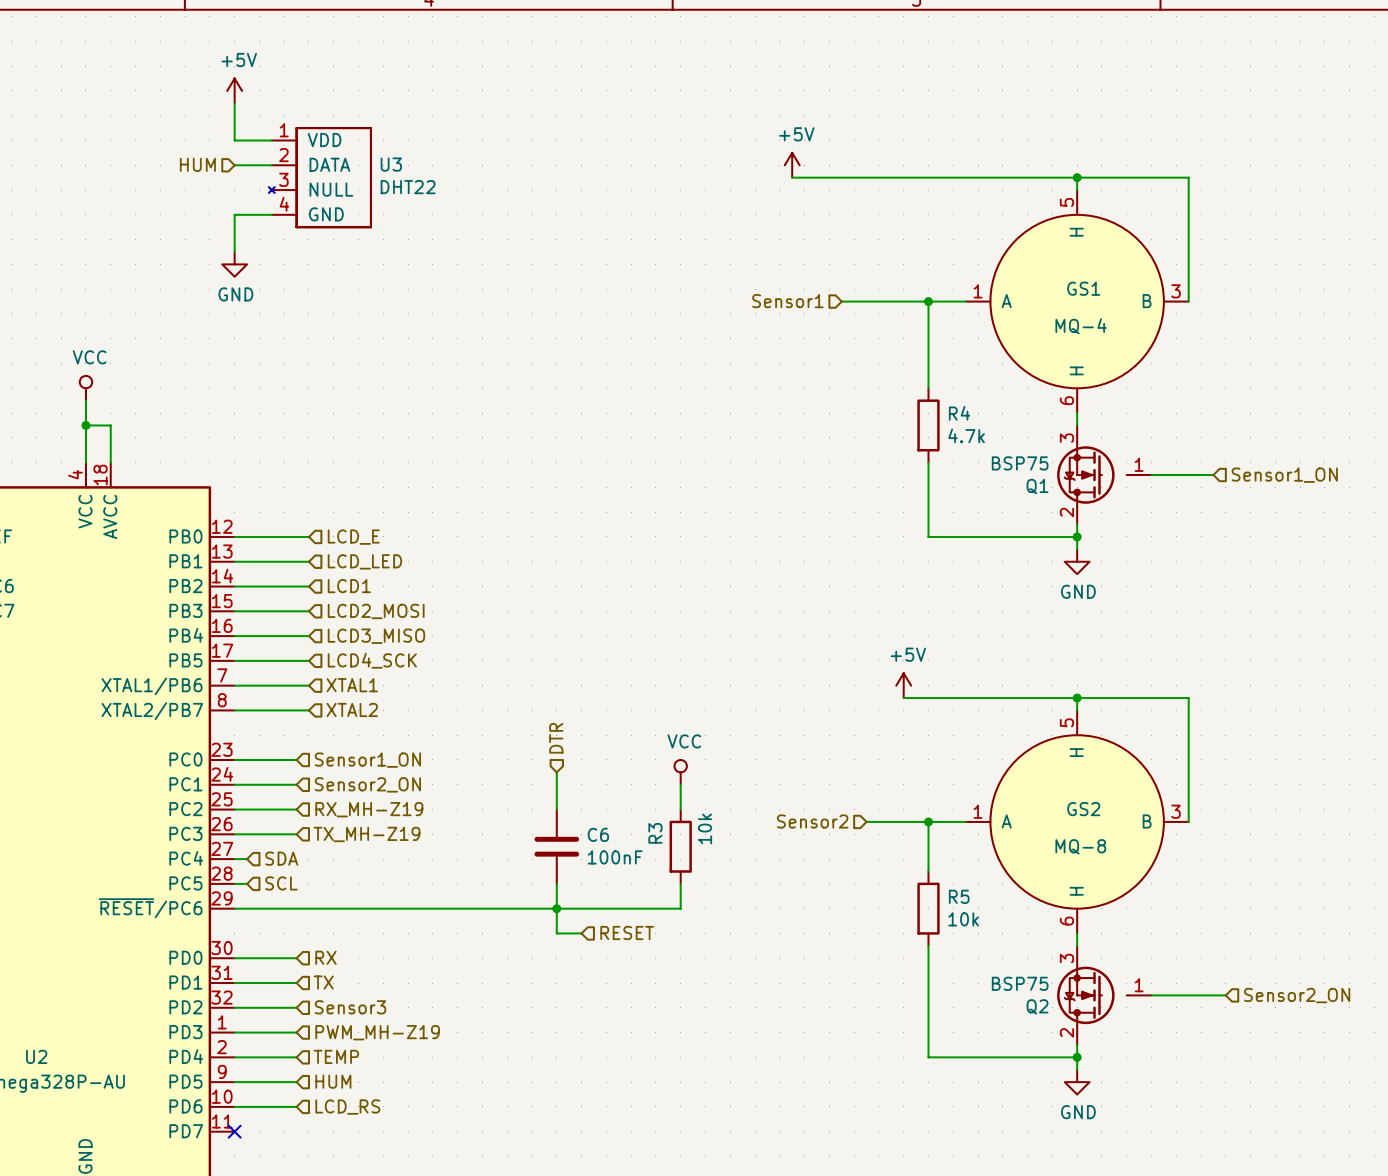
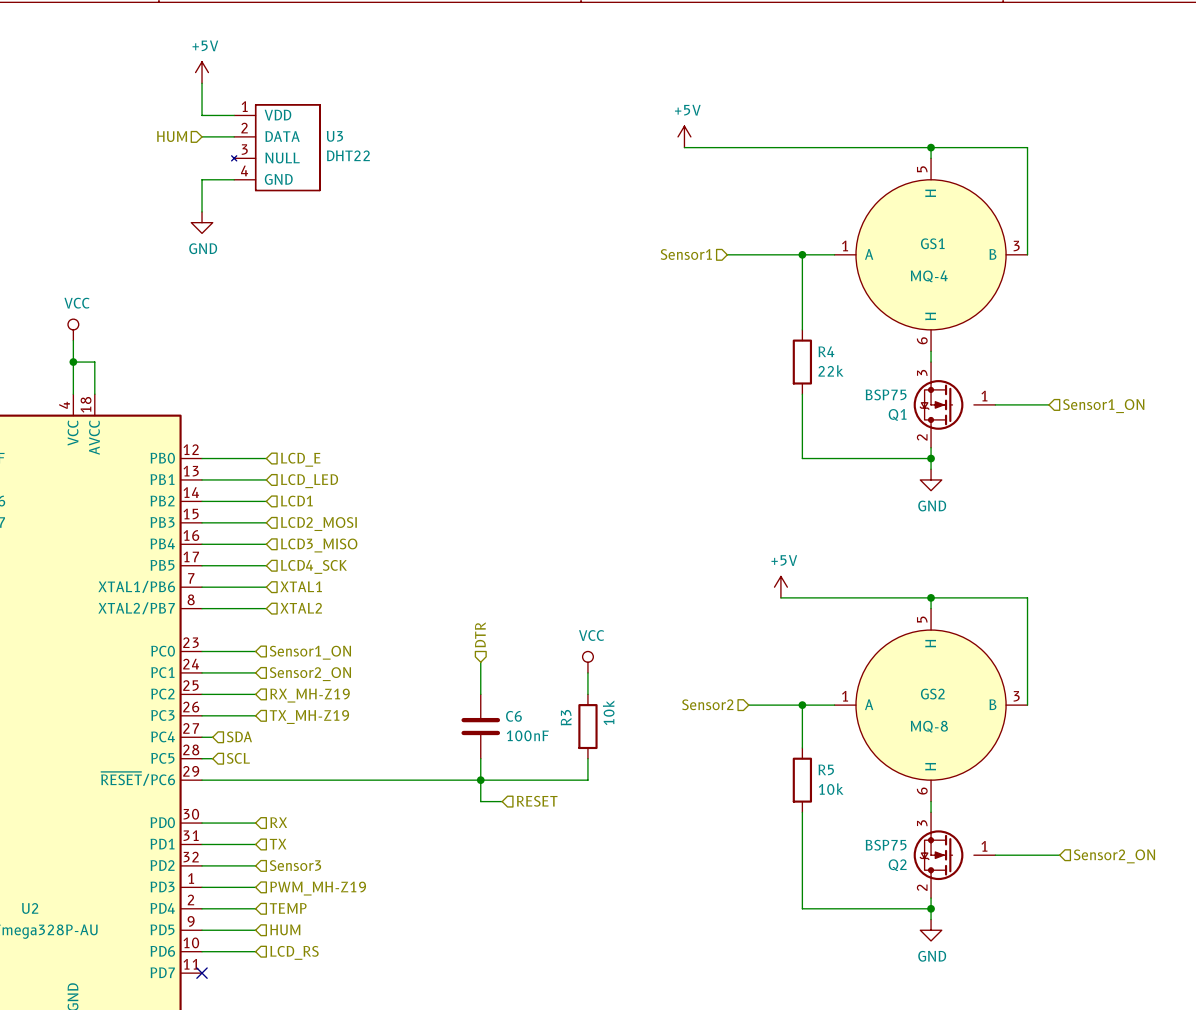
R4 value: 4.7k (966, 435) -> 22k (830, 370)

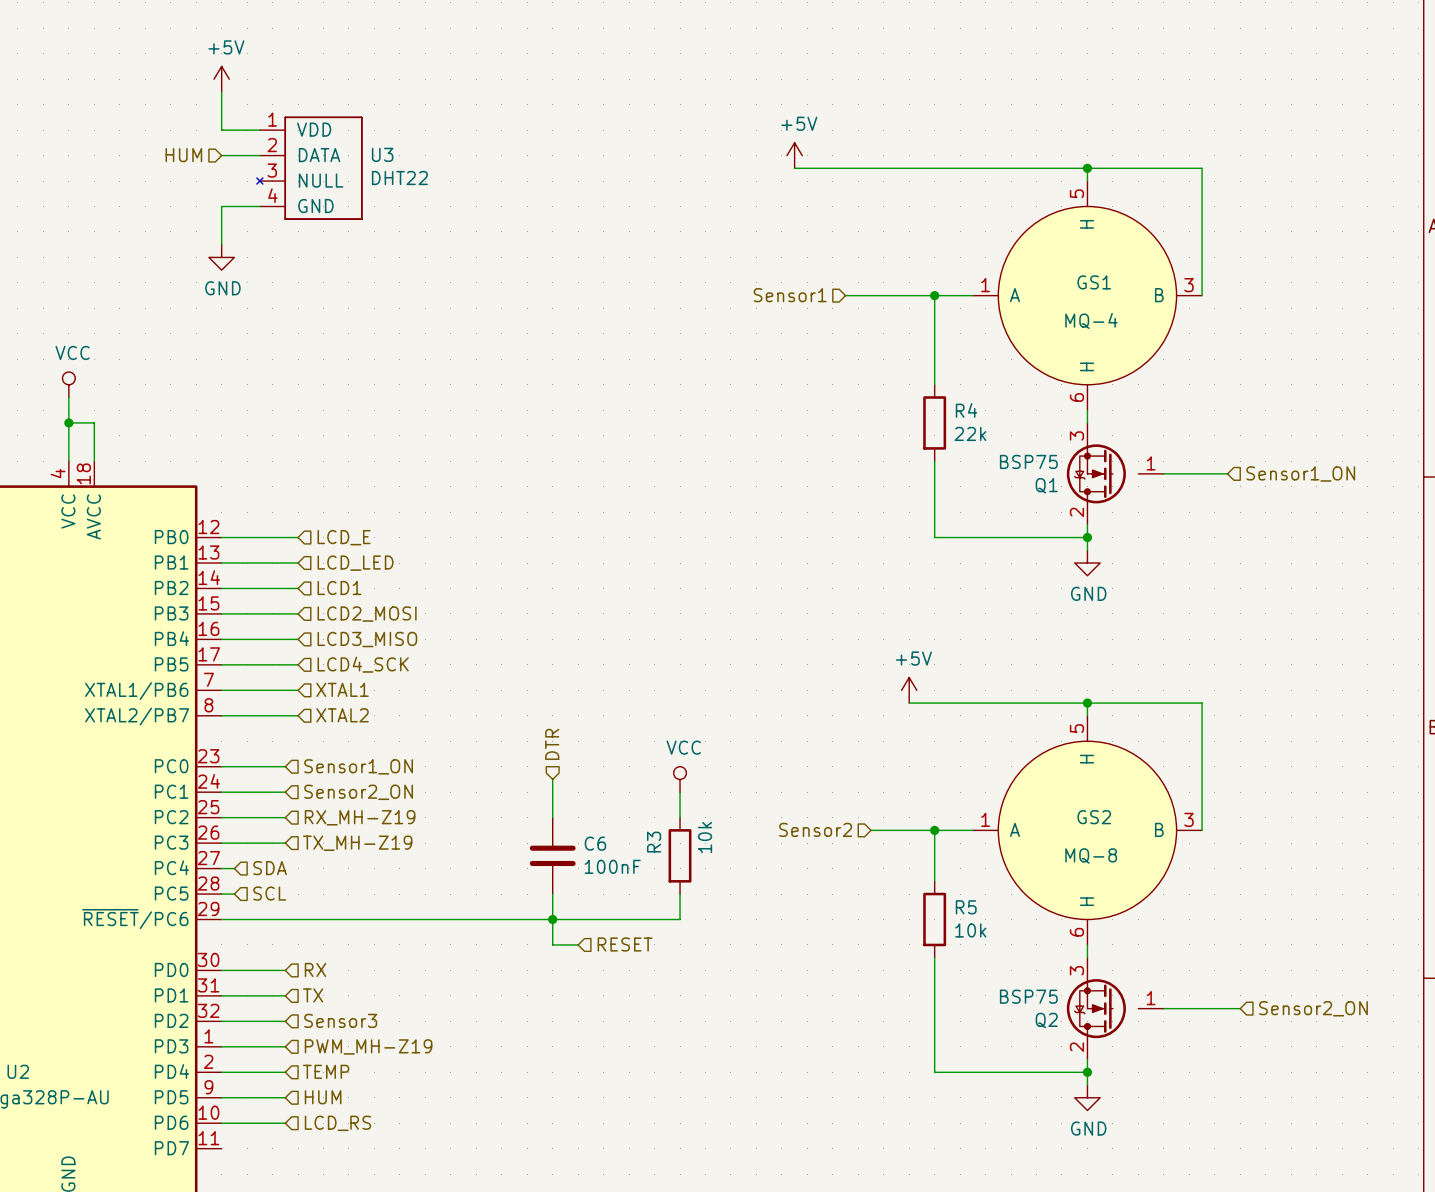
no-connect mark: (202, 973) -> none

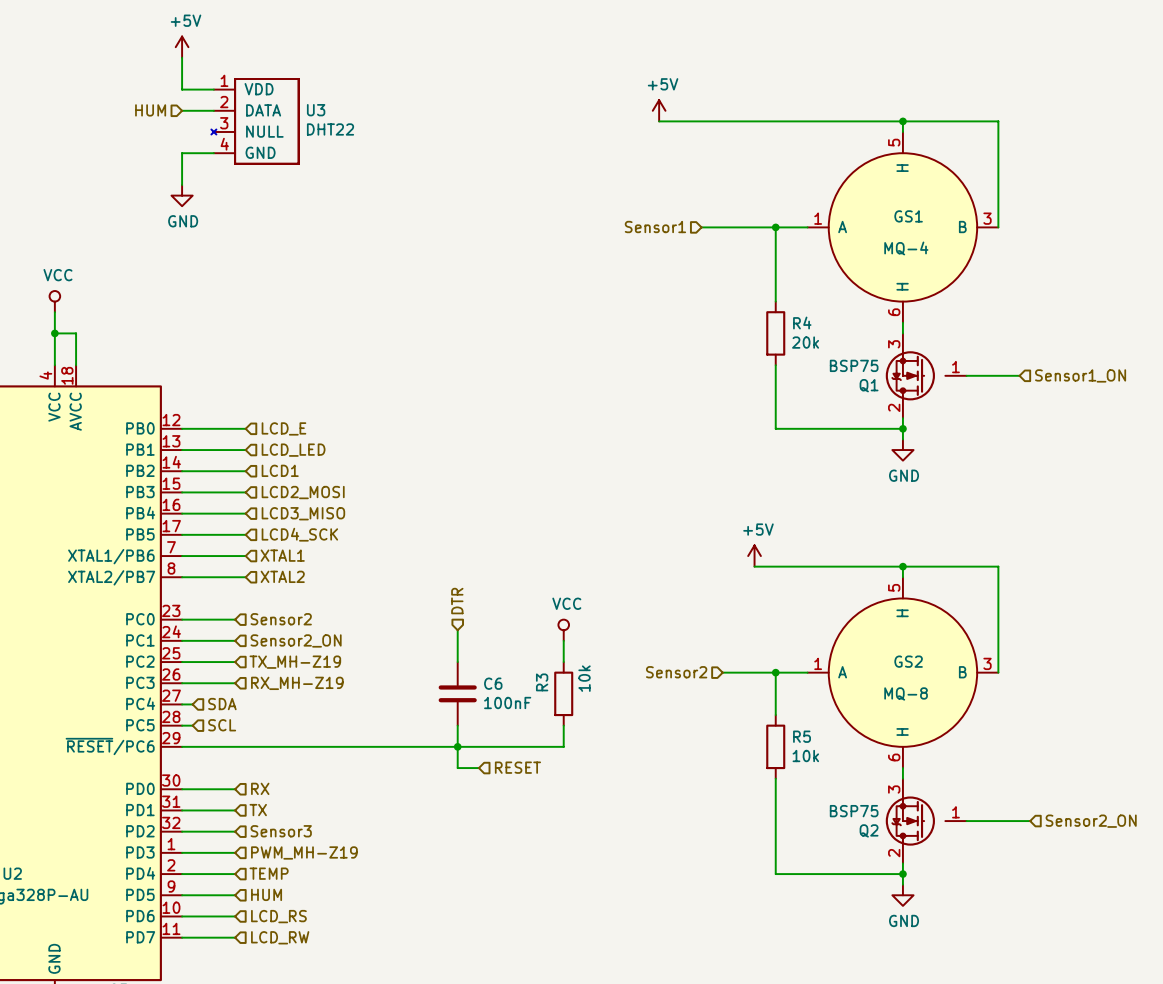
R4 value: 22k (970, 433) -> 20k (805, 342)
hierarchical label: Sensor1_ON (358, 766) -> Sensor2 (281, 619)
hierarchical label: RX_MH-Z19 (360, 817) -> TX_MH-Z19 (295, 662)
hierarchical label: TX_MH-Z19 (357, 843) -> RX_MH-Z19 (297, 683)
wire: none -> (182, 937) (235, 937)
hierarchical label: none -> LCD_RW (280, 937)

